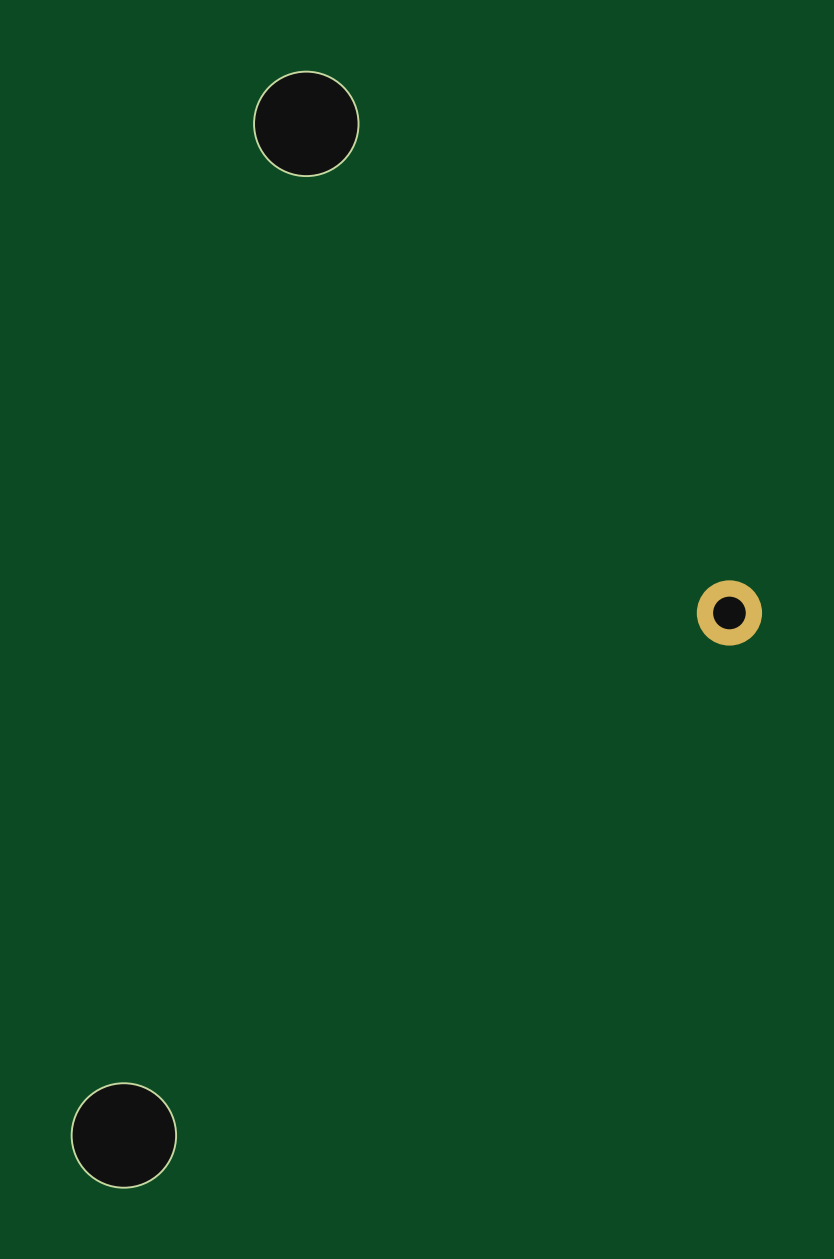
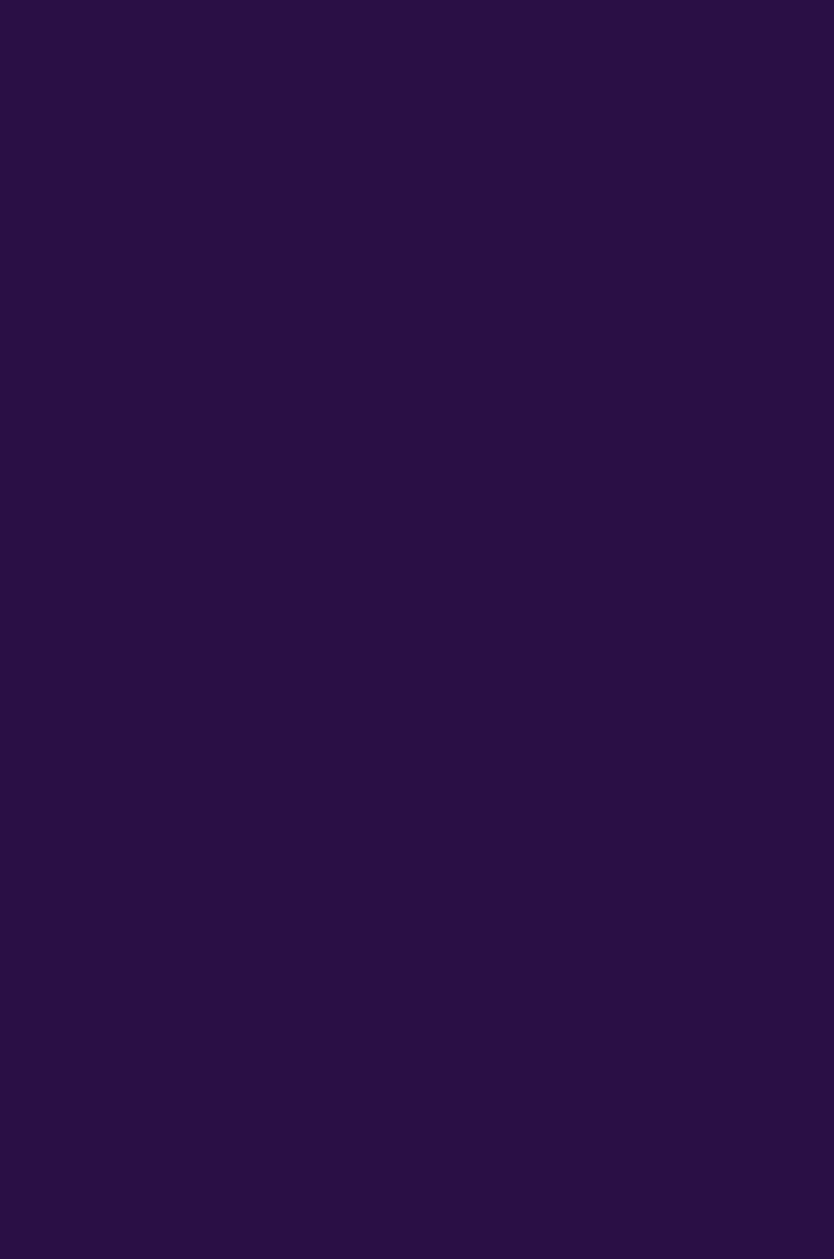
part: (306, 123) -> none
part: (729, 612) -> none
part: (123, 1135) -> none

